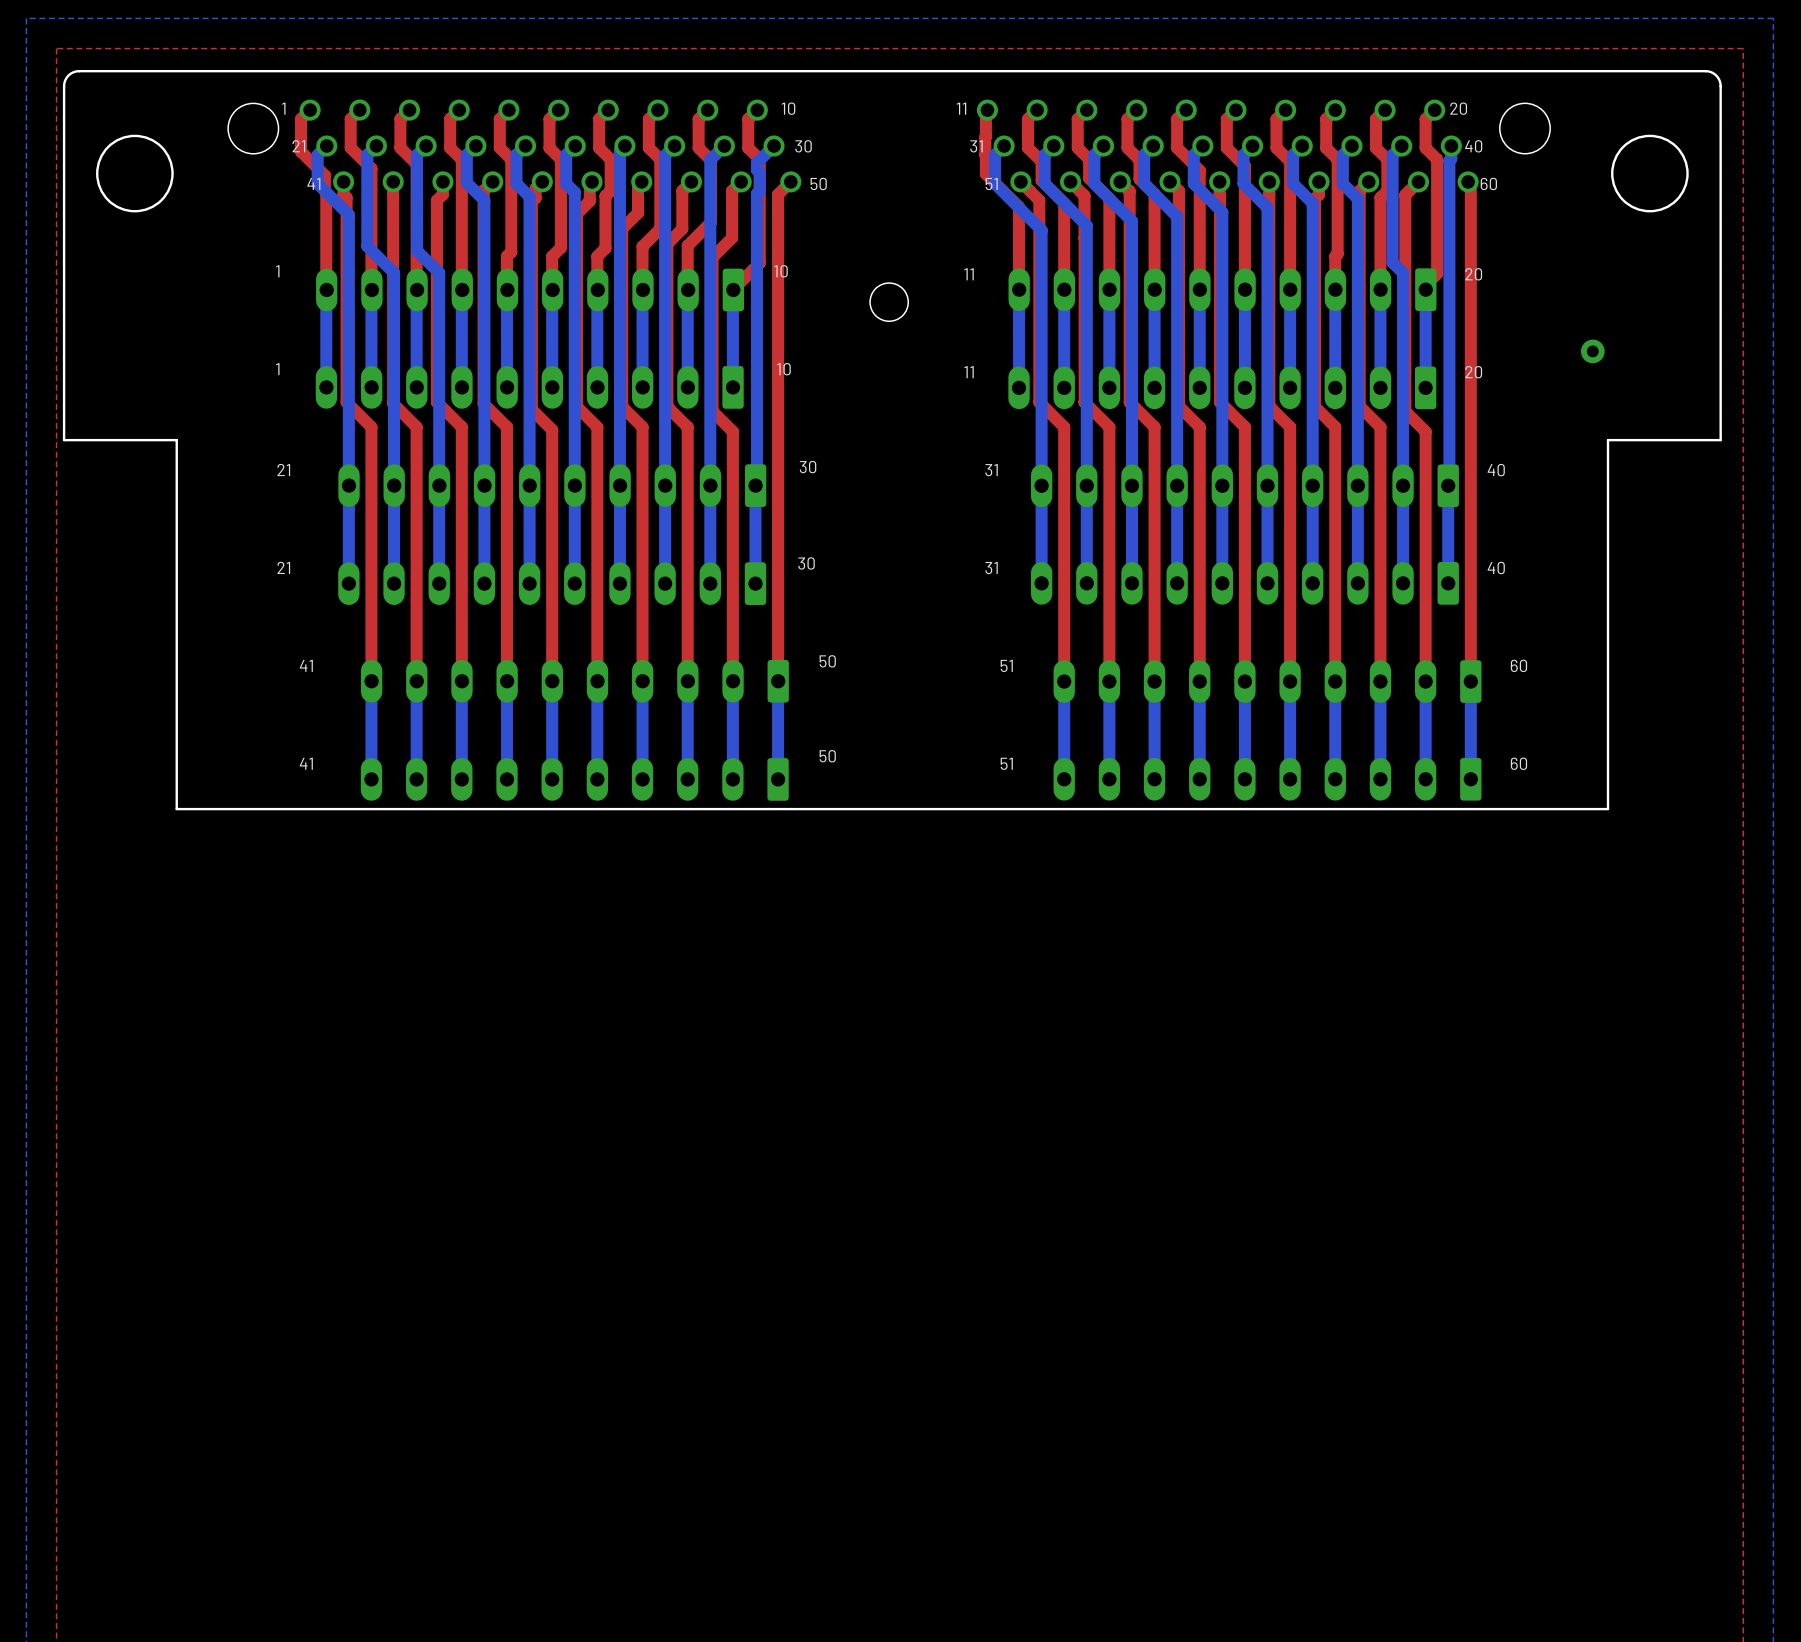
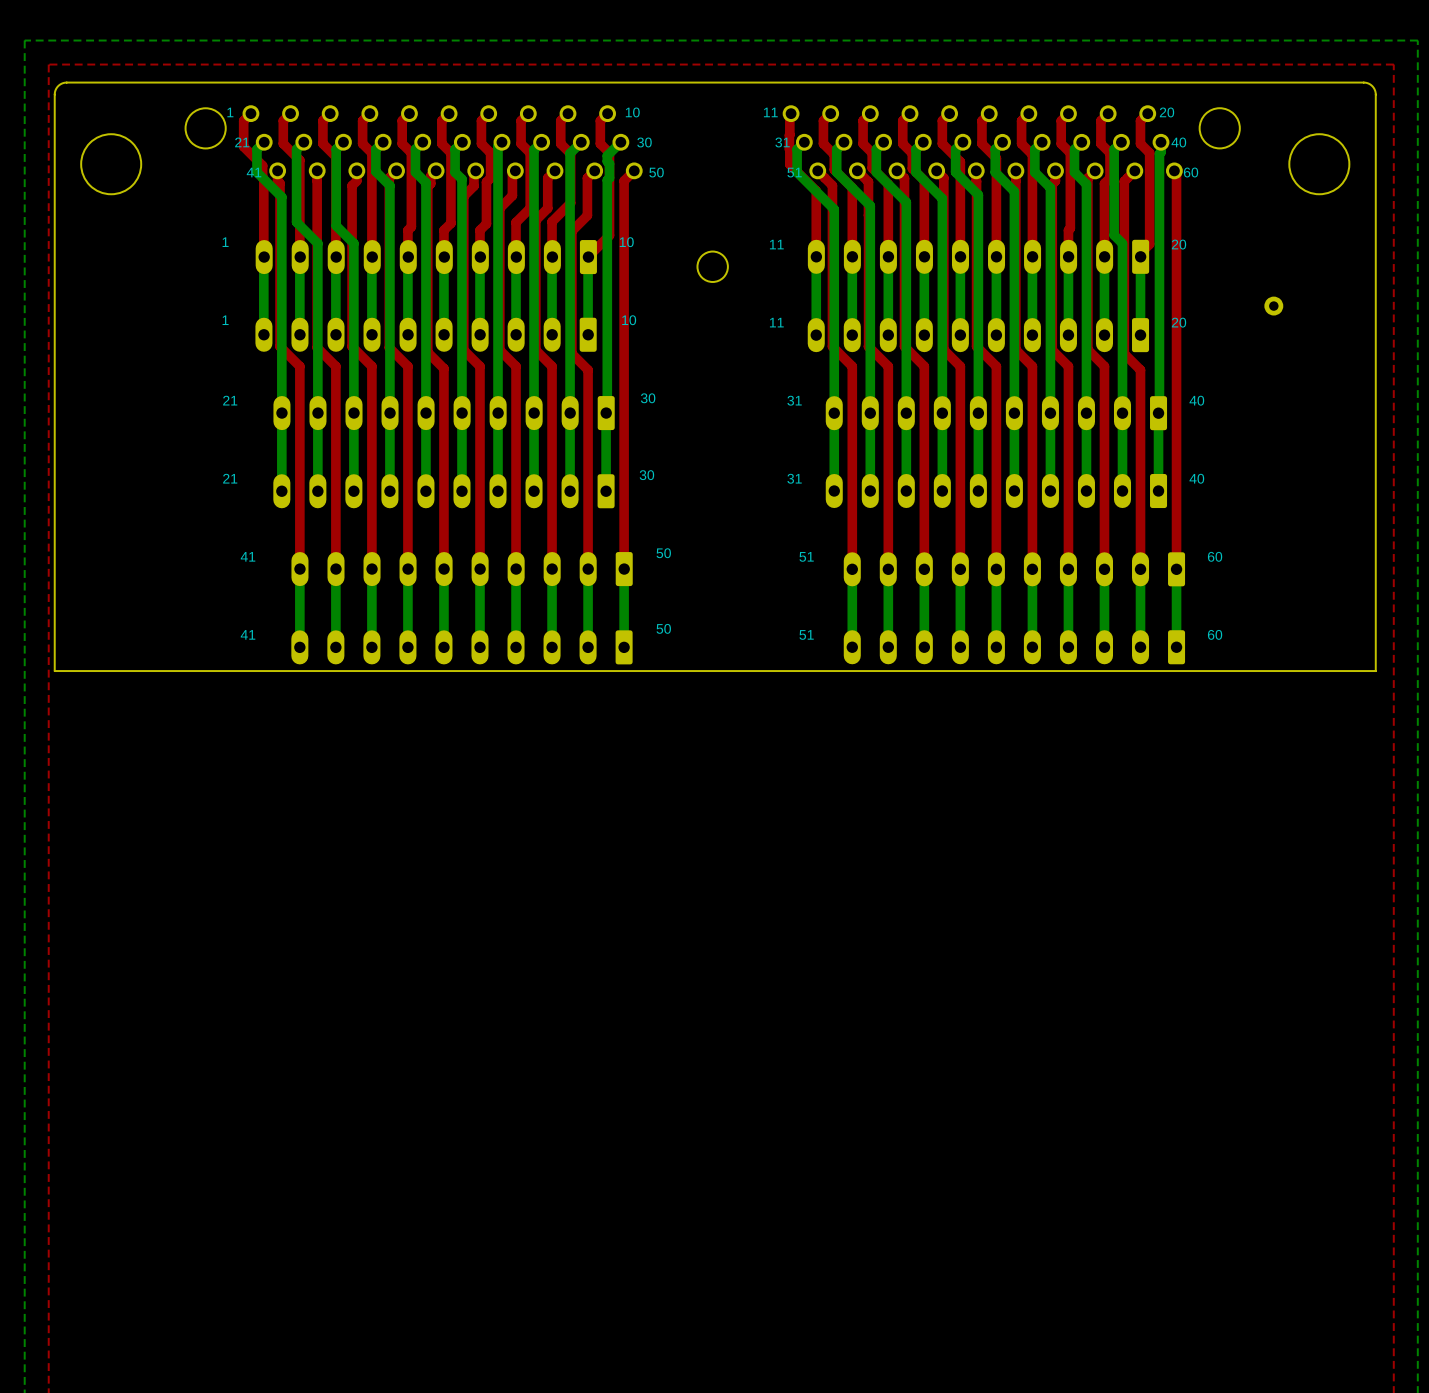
board edge: (64, 440) (176, 440) (176, 809) -> (54, 376) (54, 671) (144, 671)
board edge: (1720, 440) (1608, 440) (1608, 809) -> (1375, 376) (1375, 671) (1285, 671)

